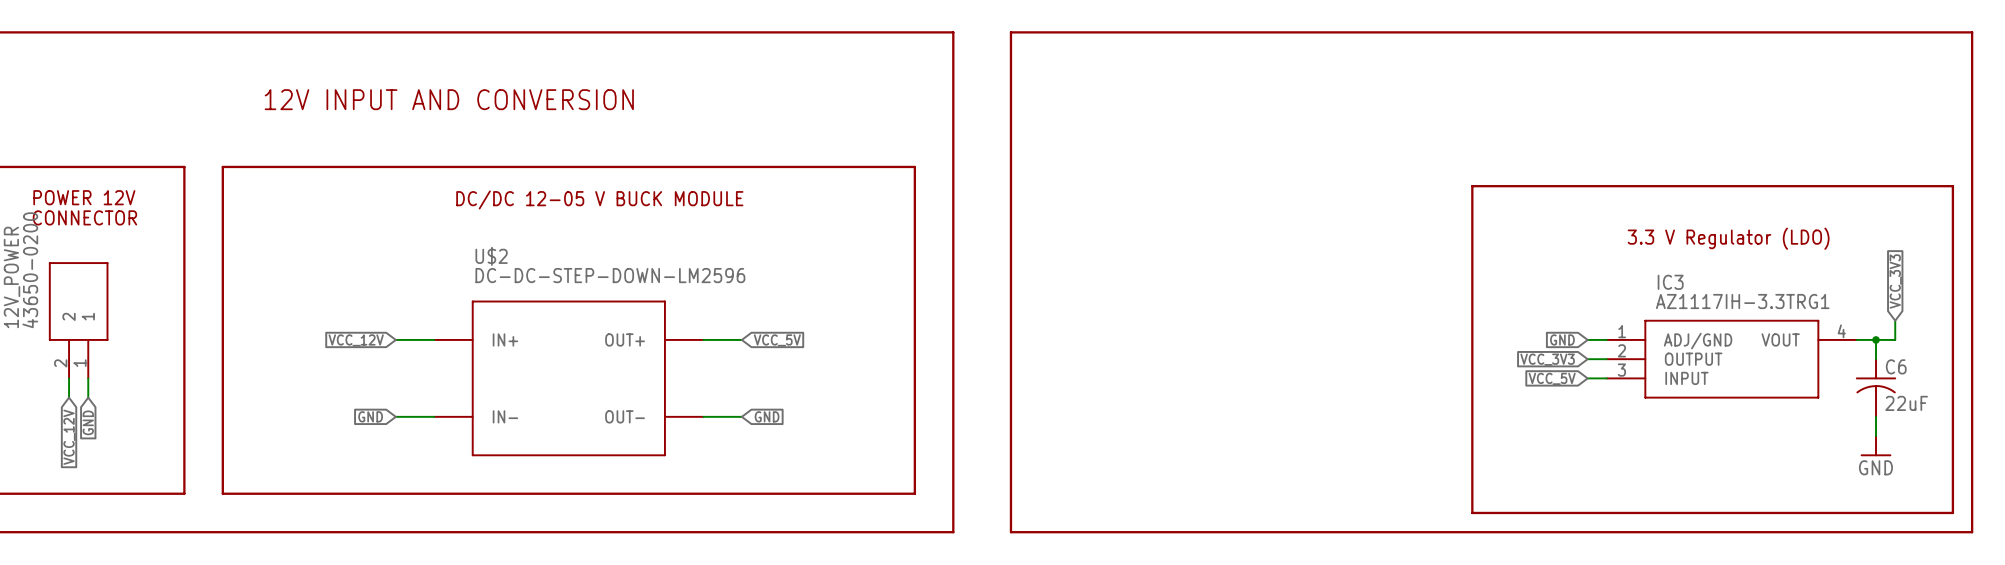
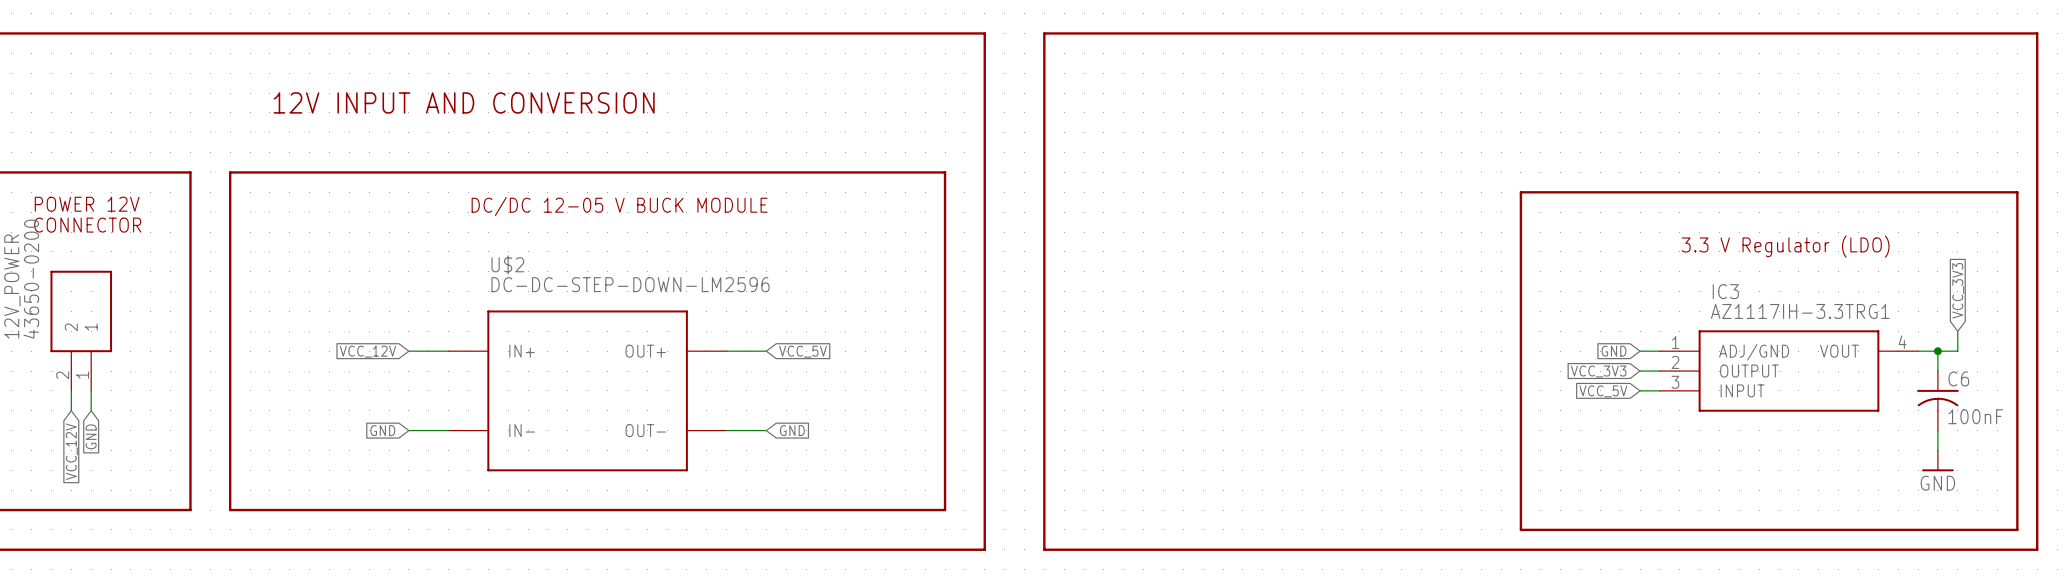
C6 value: 22uF (1906, 403) -> 100nF (1975, 416)

